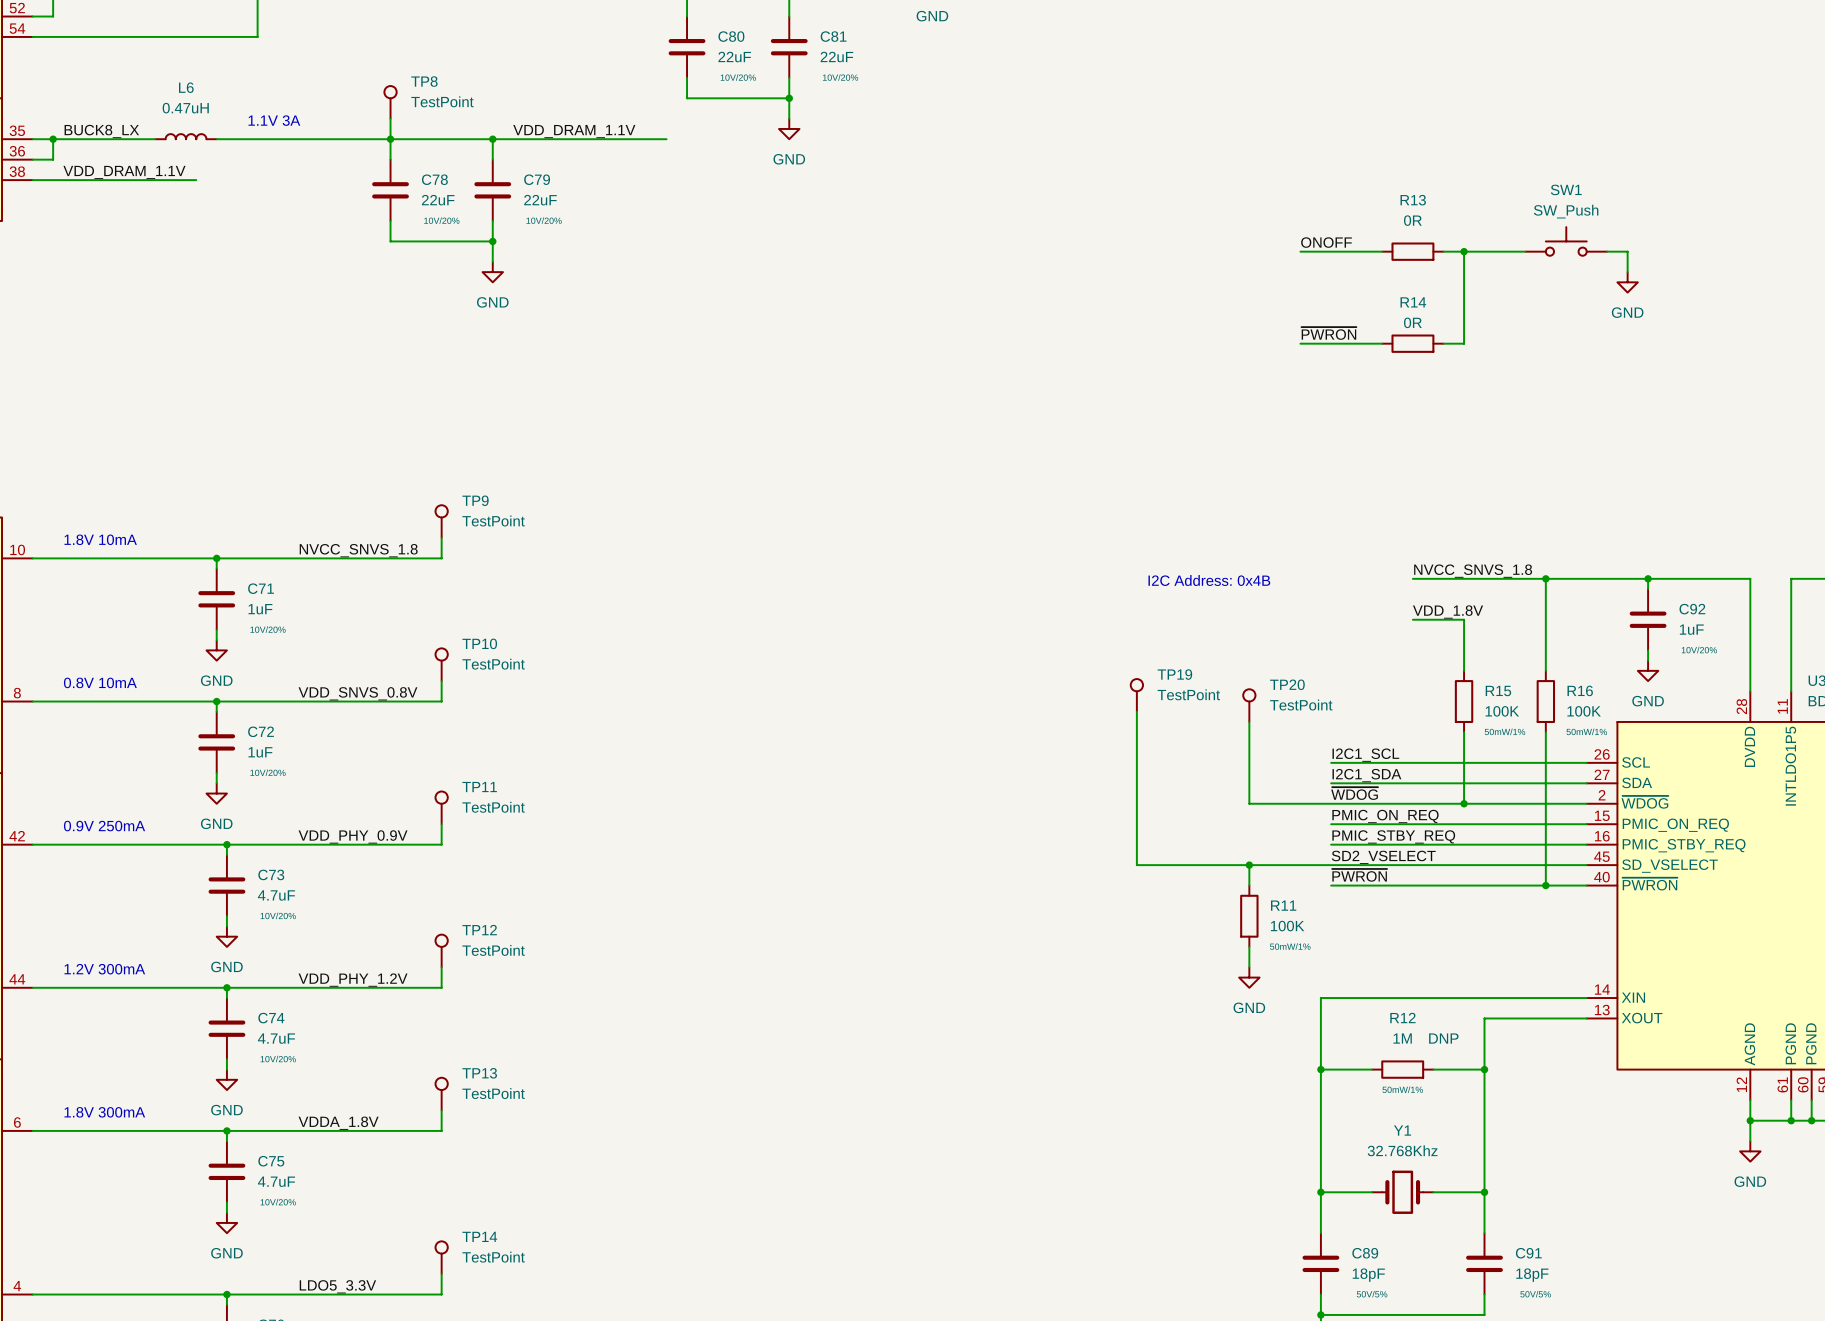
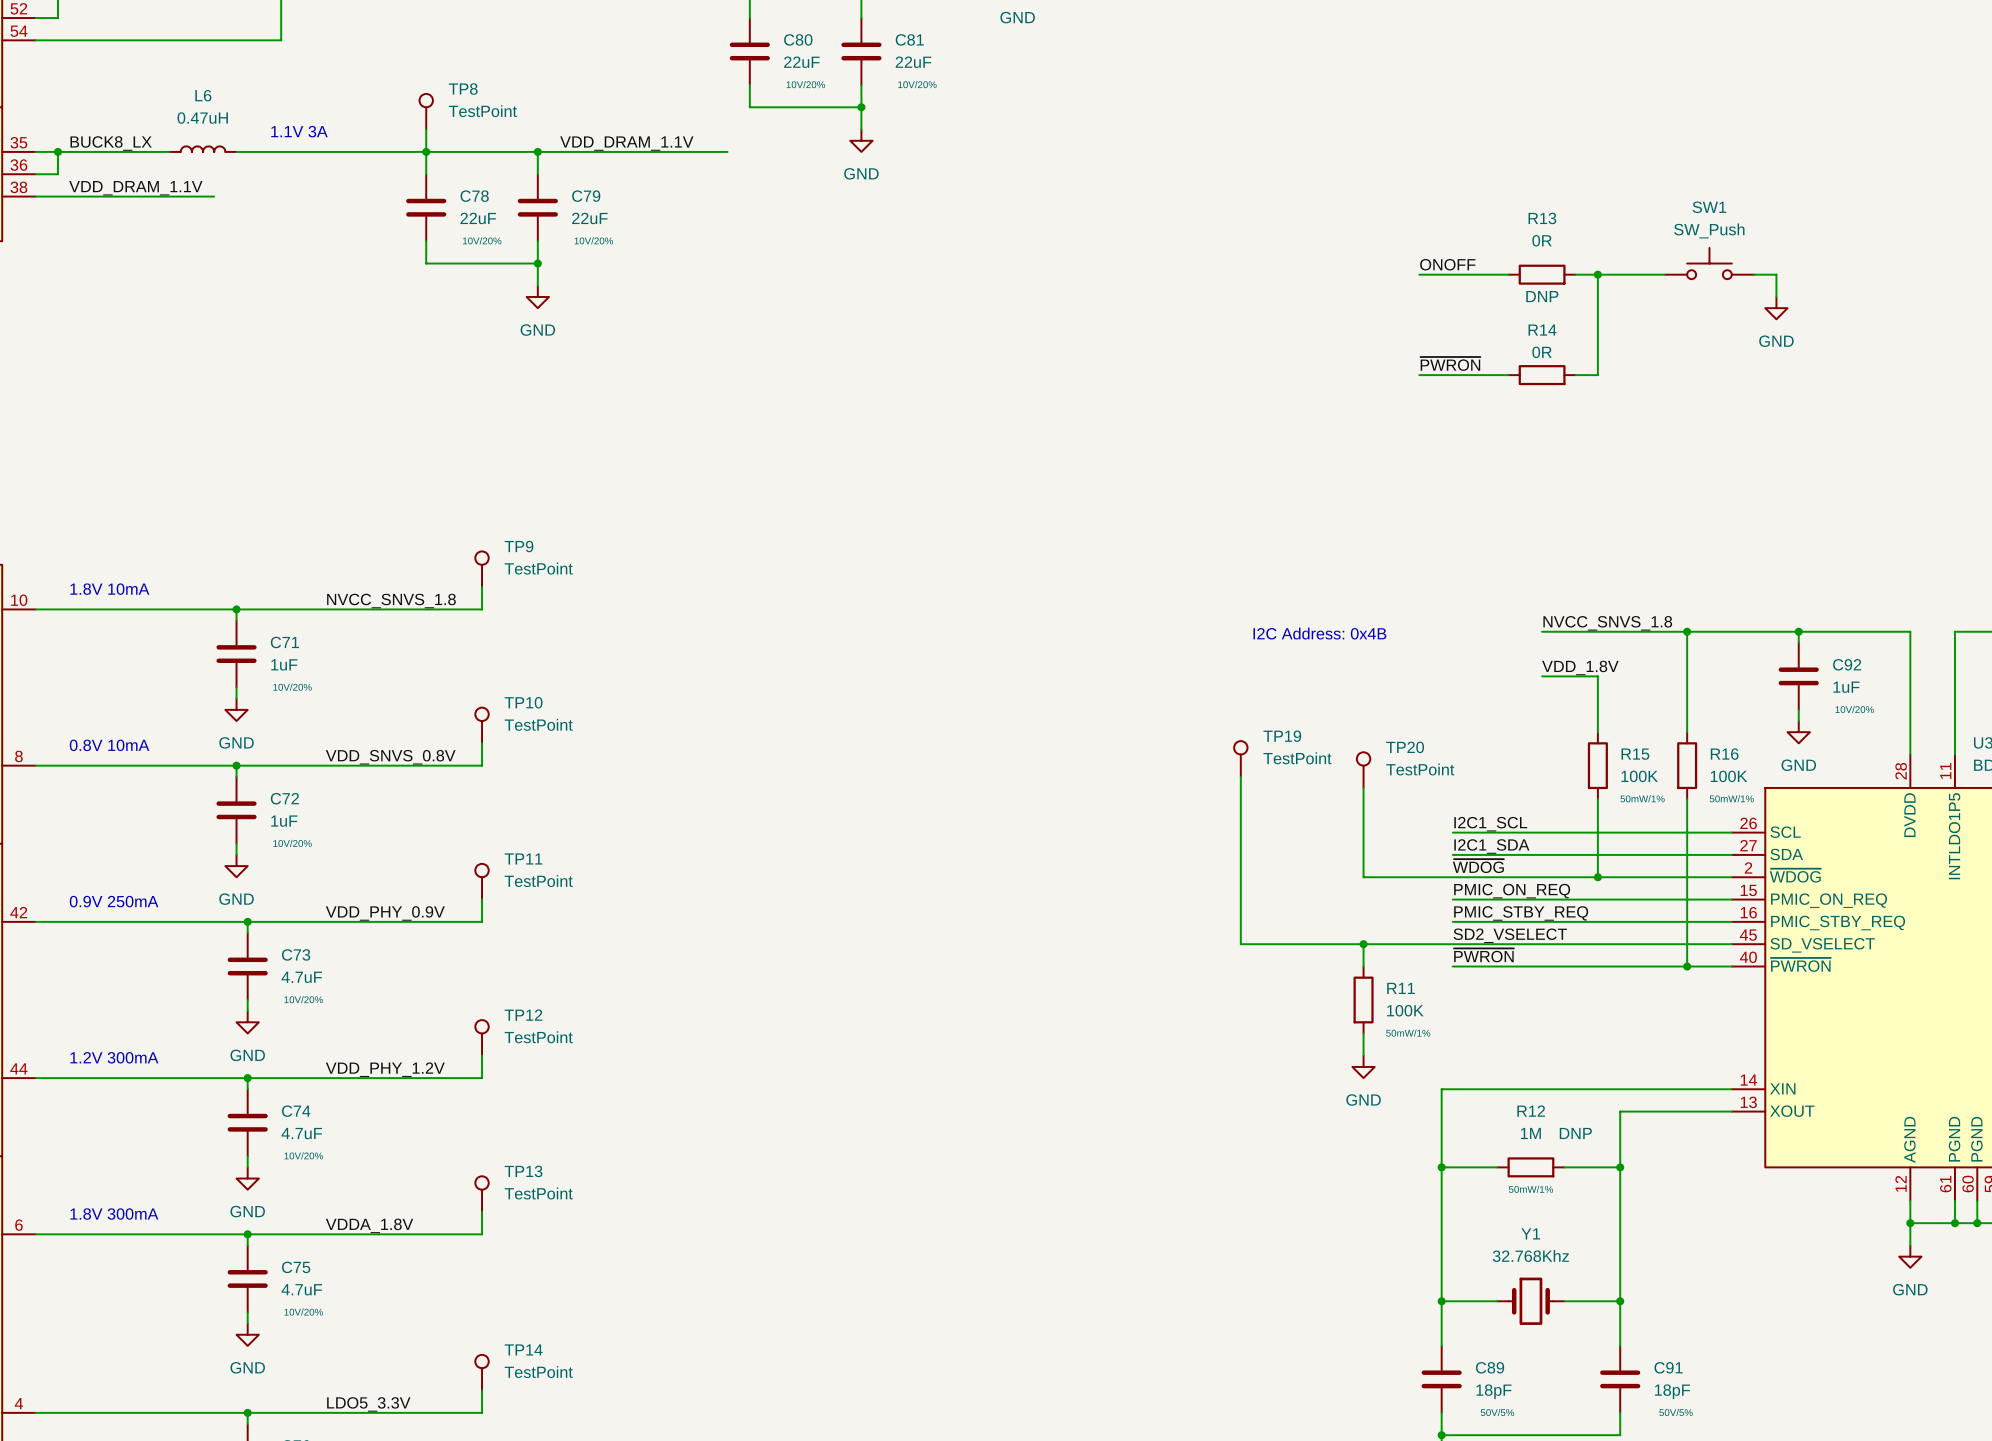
R13 text: none -> DNP (1542, 296)

